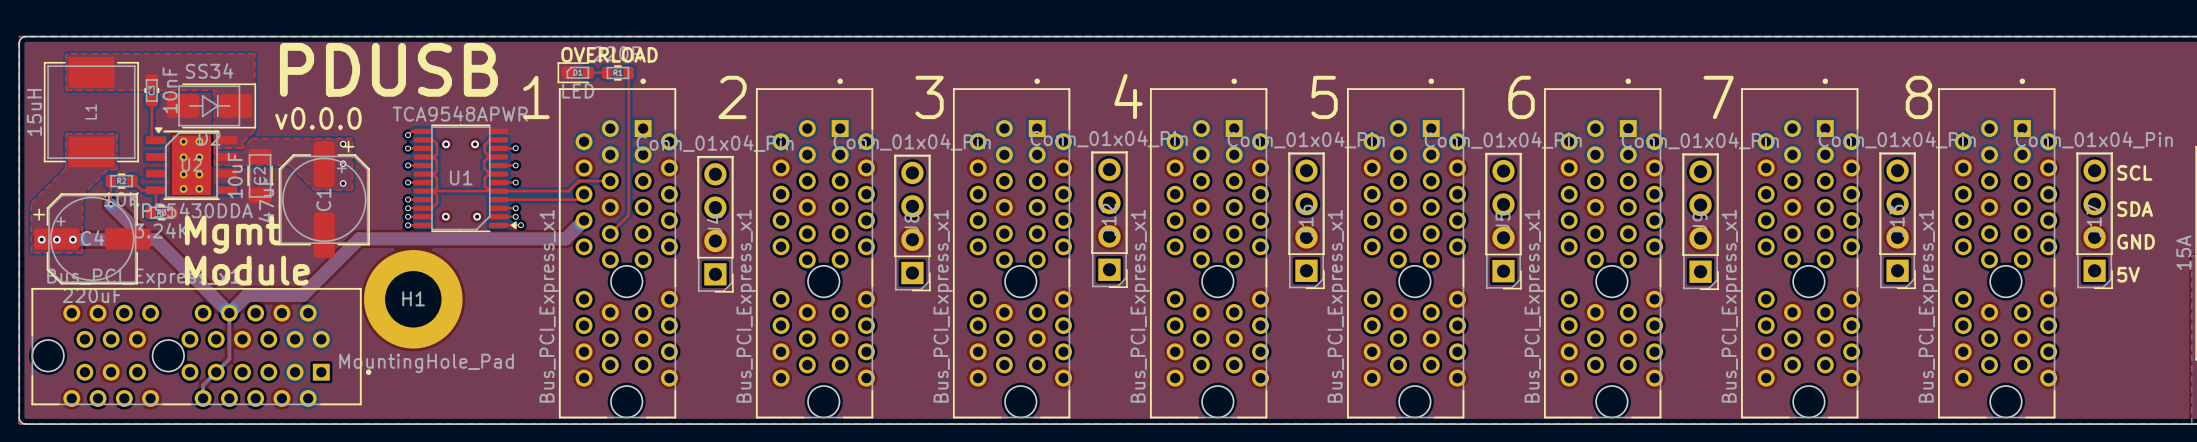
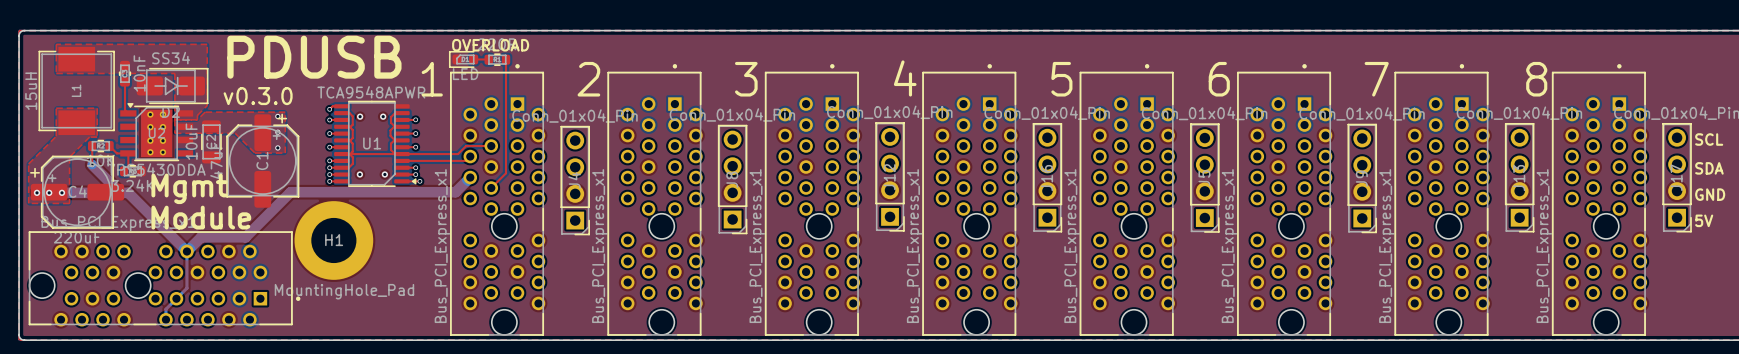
text: v0.0.0 (318, 118) -> v0.3.0 (258, 96)

